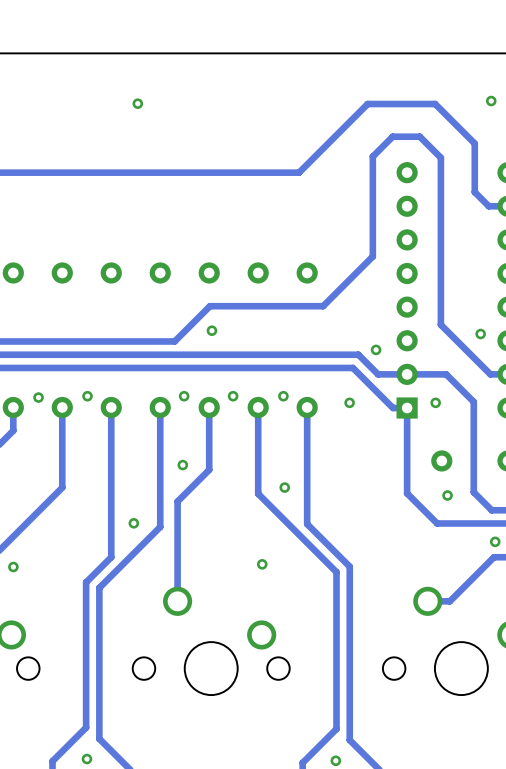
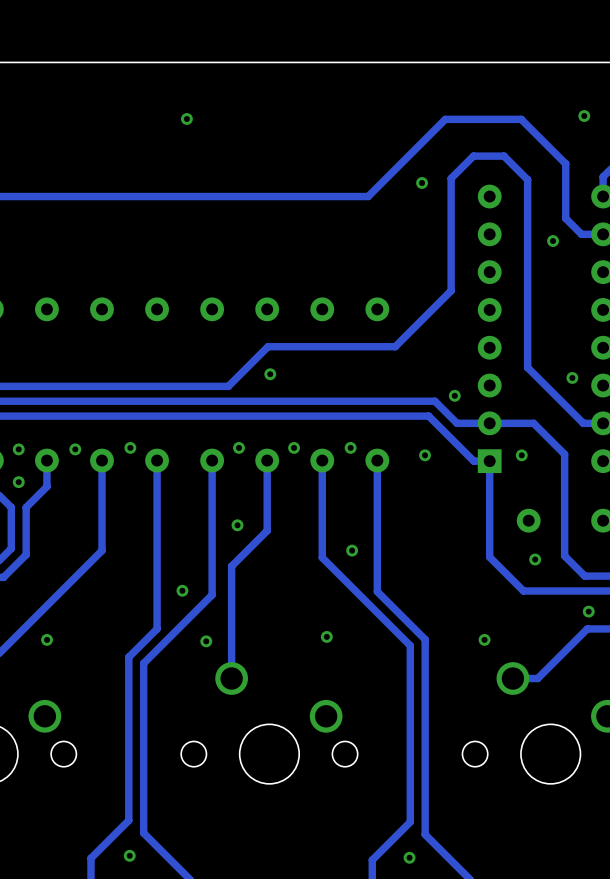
via: none -> (422, 182)
via: none -> (553, 241)
via: none -> (484, 639)
via: none -> (206, 641)

